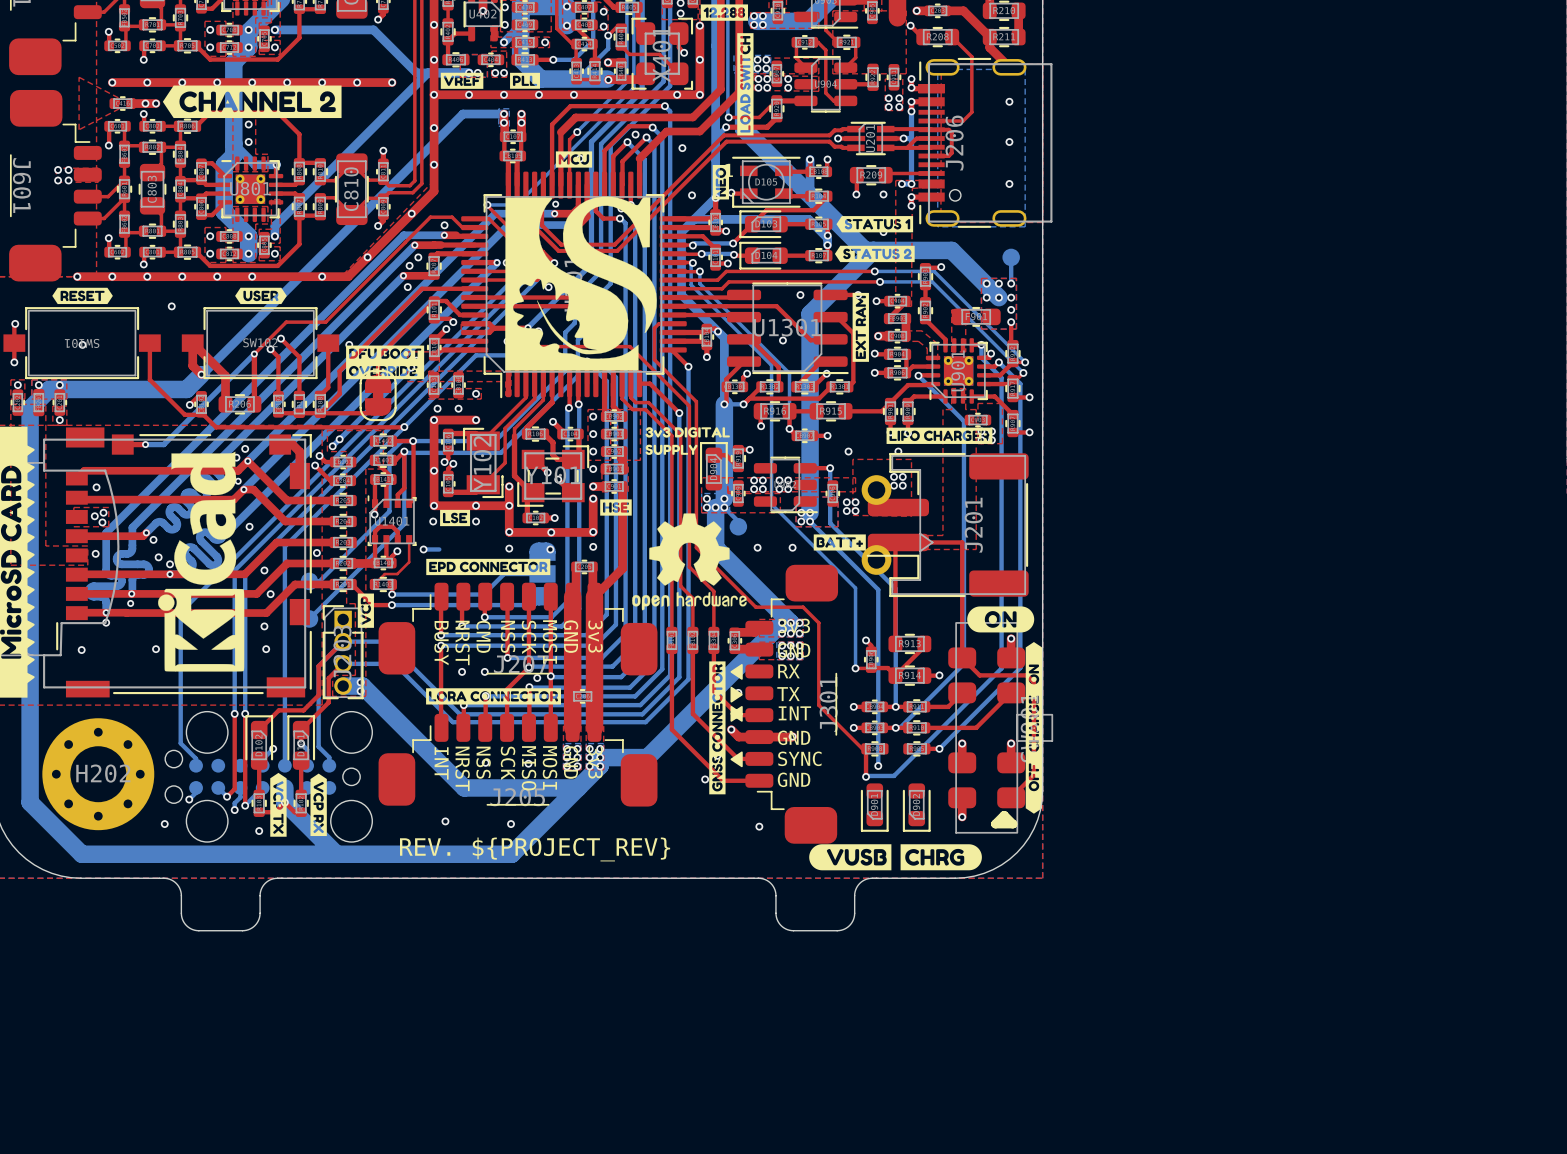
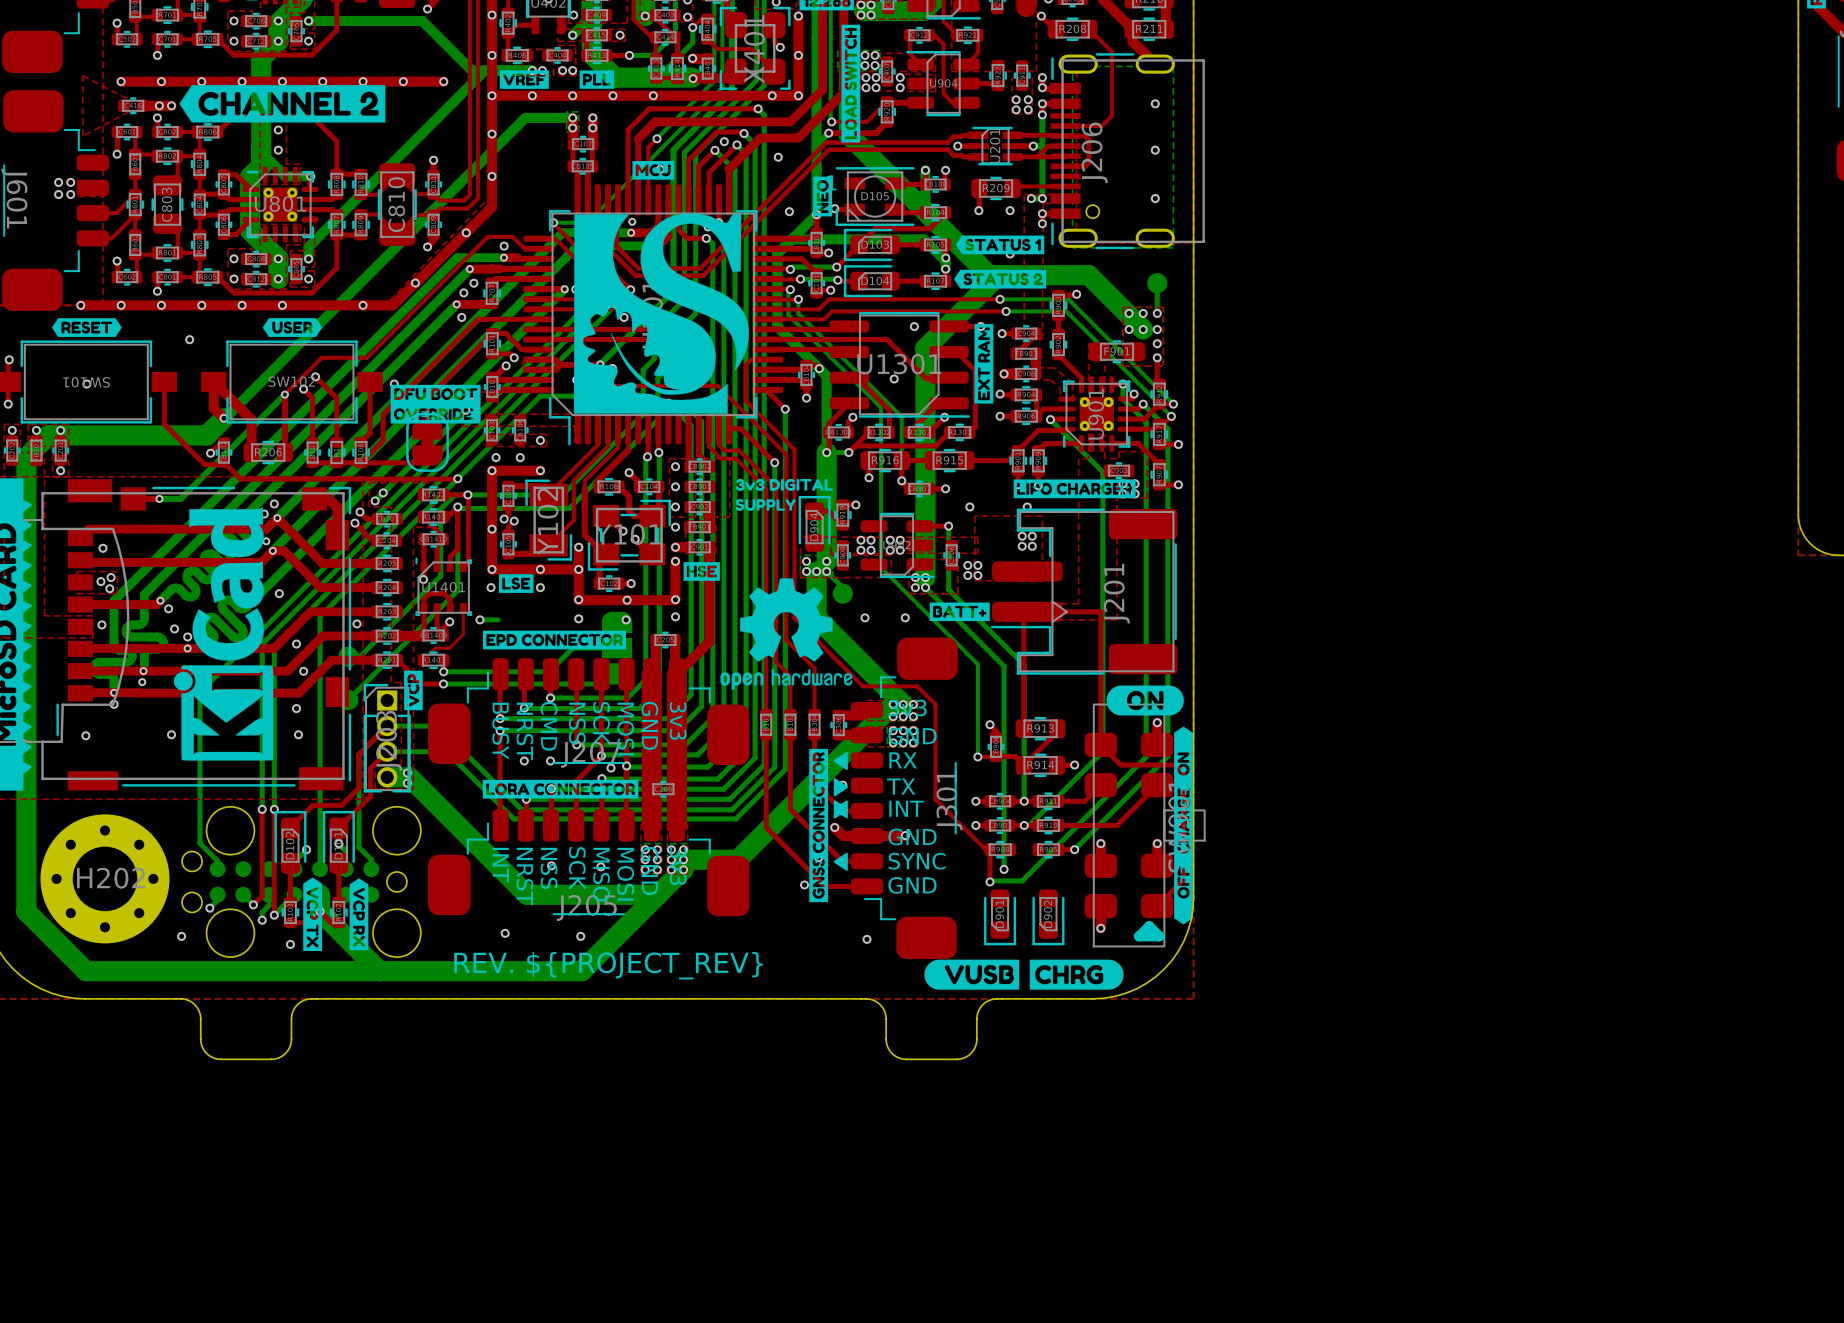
J201 footprint: [861, 452, 1029, 598] -> [990, 508, 1178, 675]

